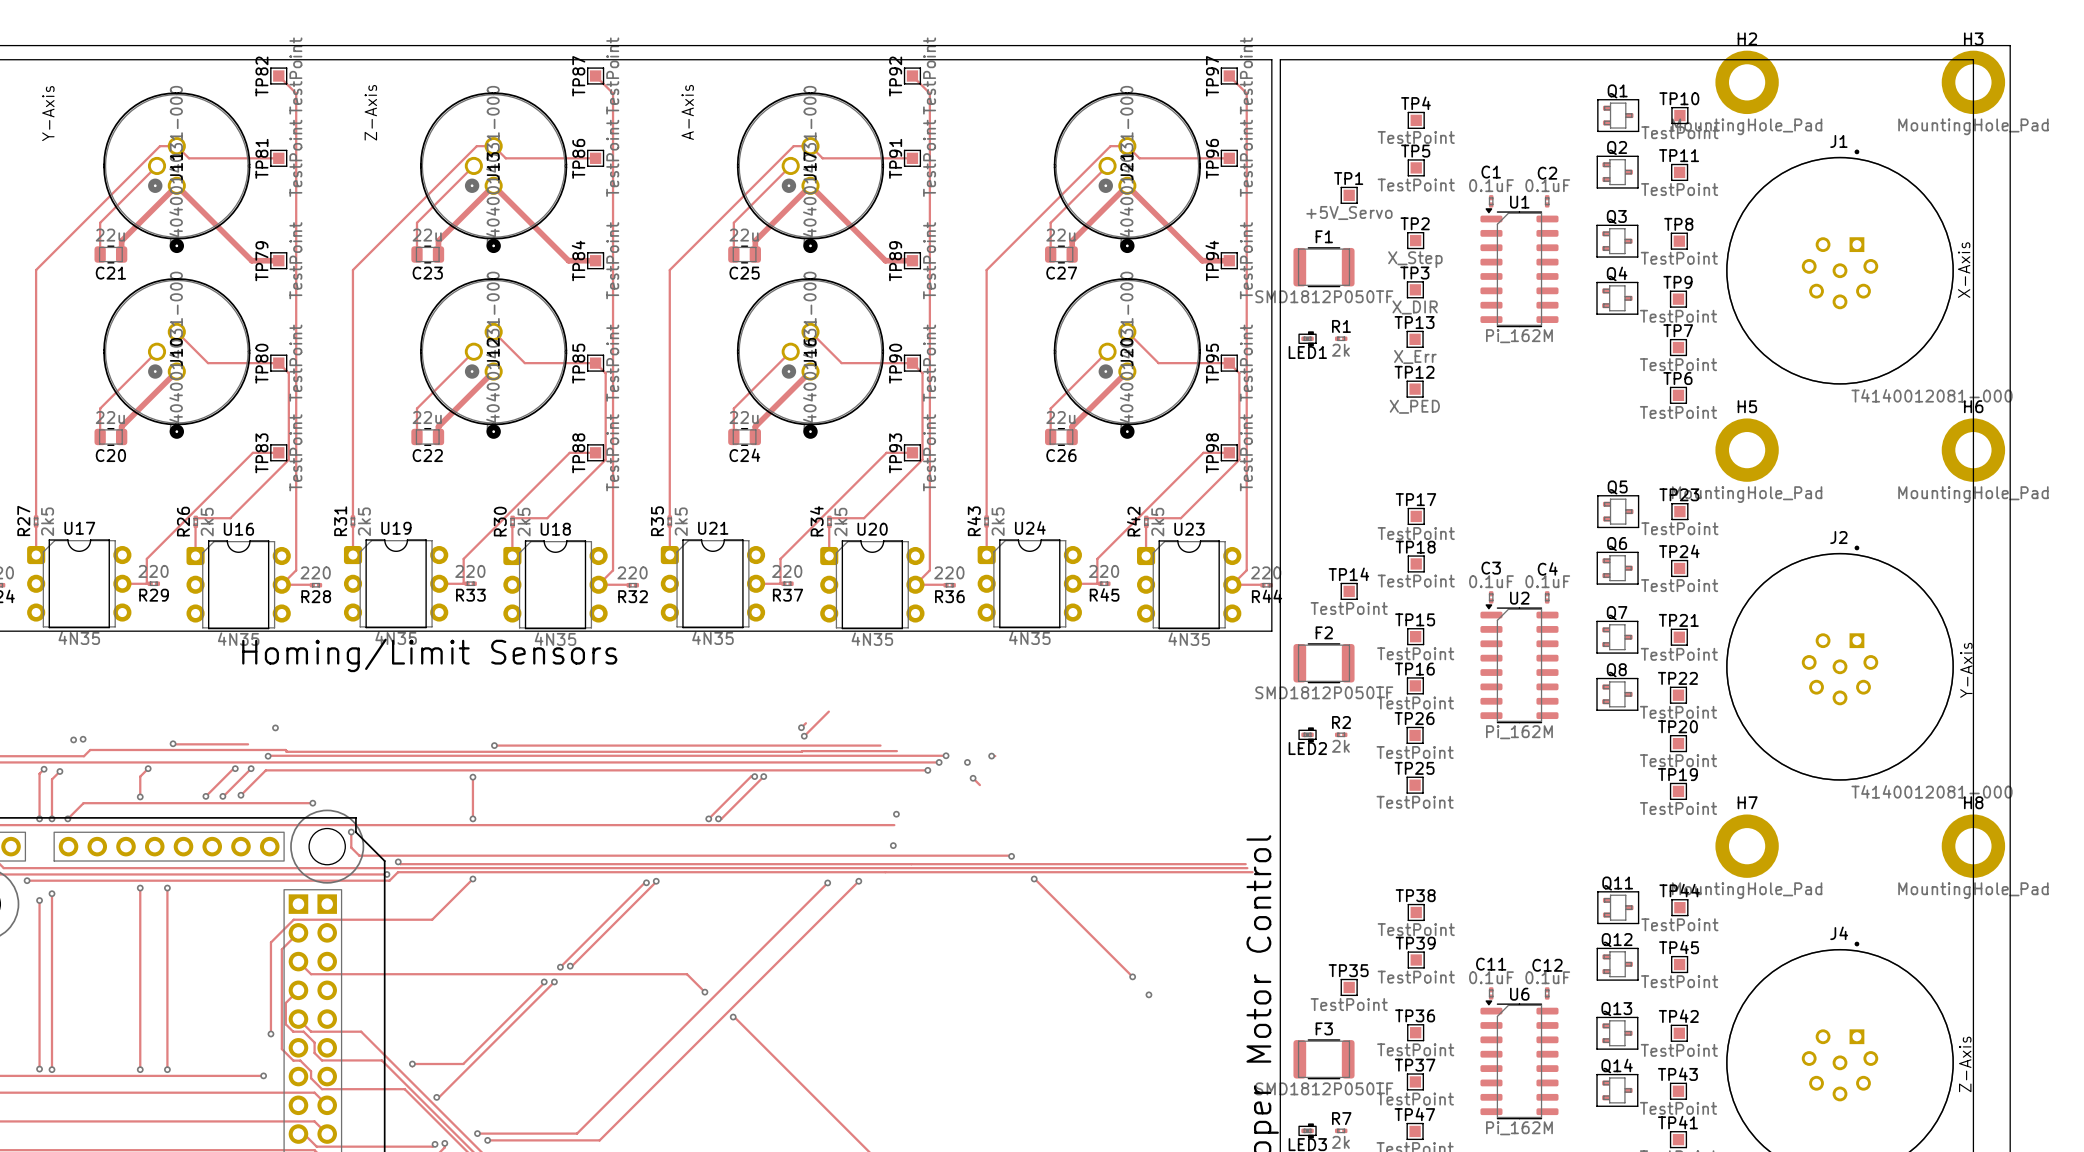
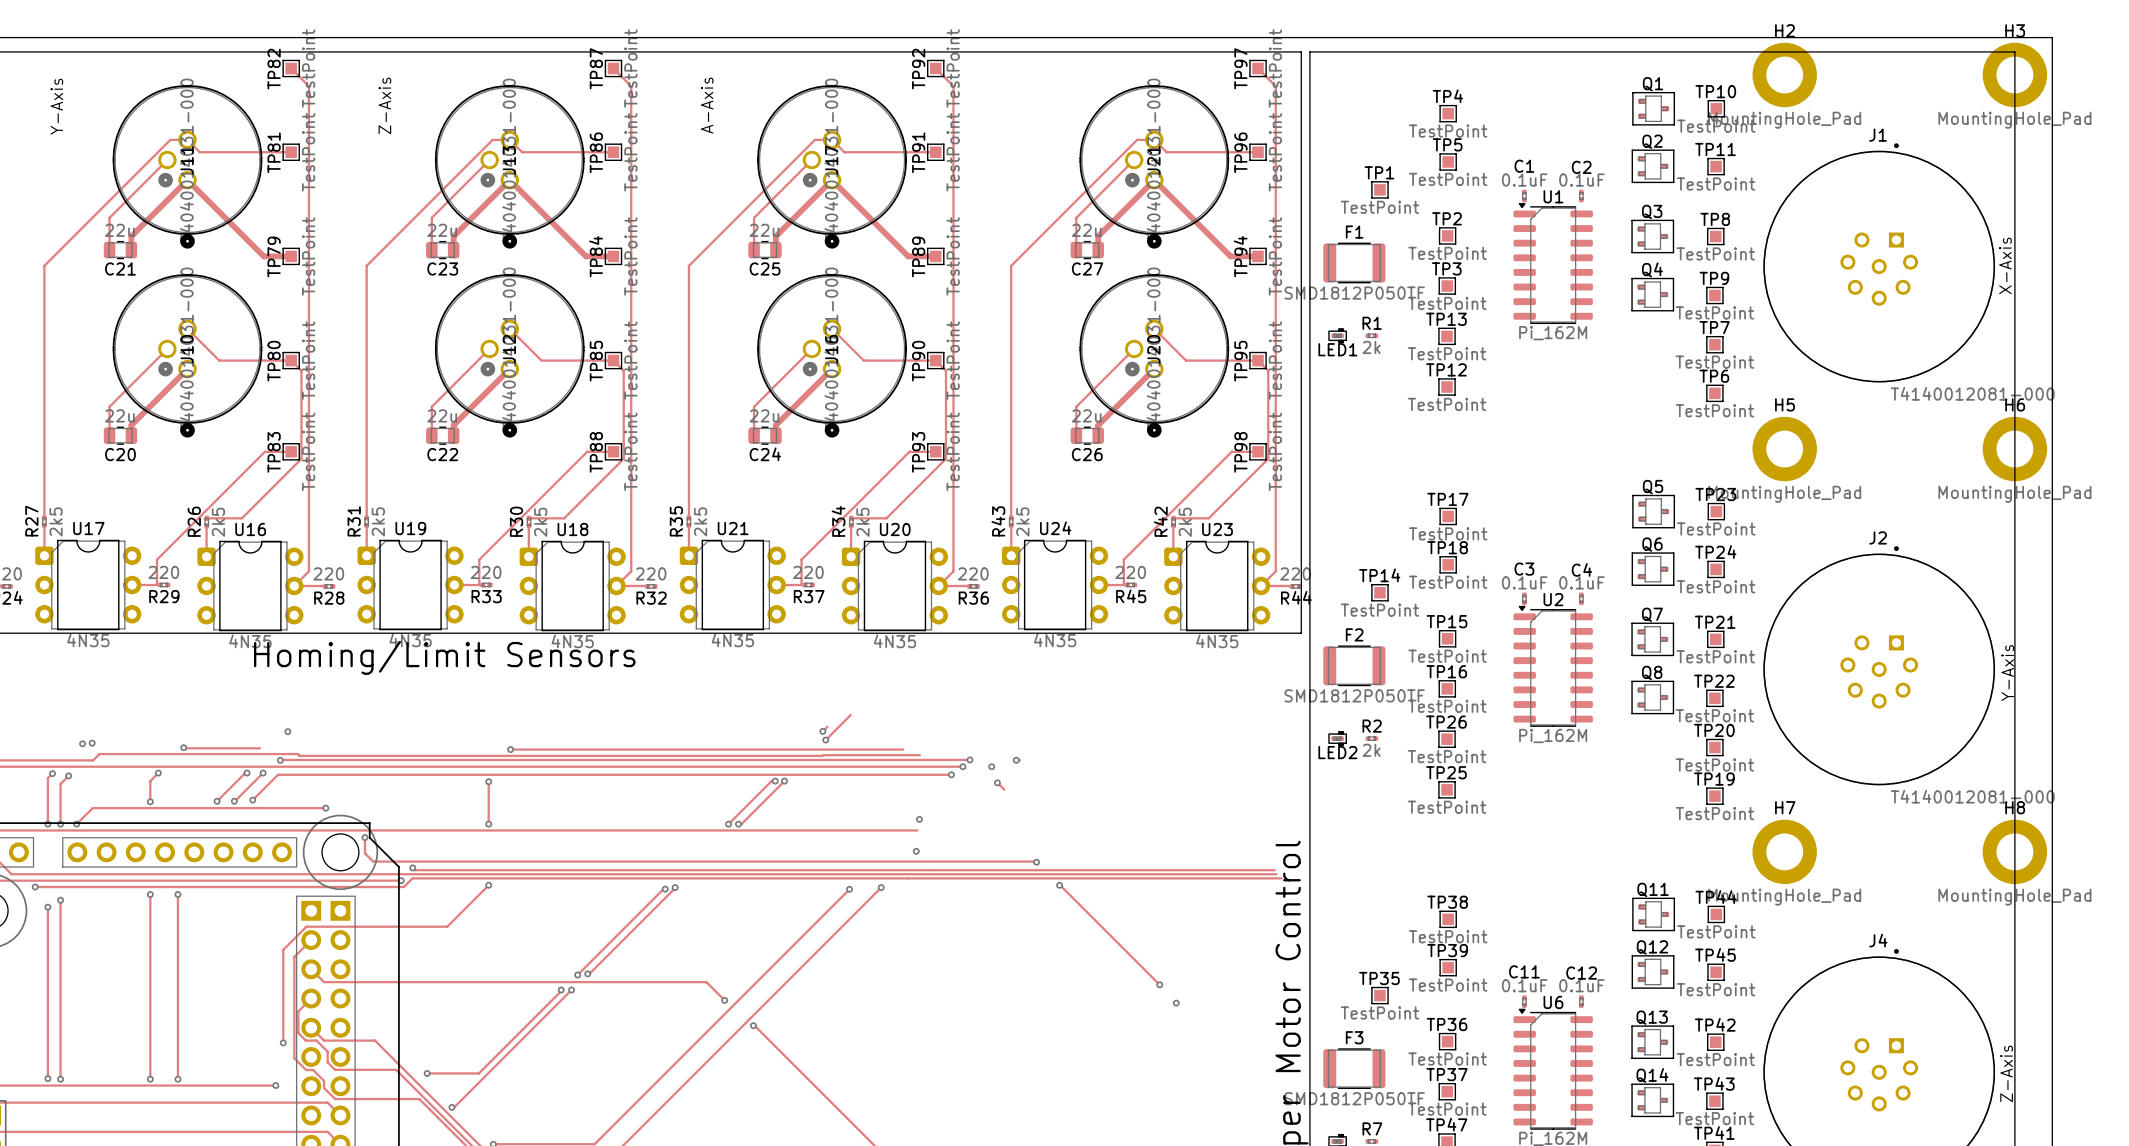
TP1 value: +5V_Servo (1349, 212) -> TestPoint (1379, 207)
TP2 value: X_Step (1415, 259) -> TestPoint (1447, 253)
TP3 value: X_DIR (1415, 307) -> TestPoint (1447, 303)
TP13 value: X_Err (1415, 356) -> TestPoint (1447, 353)
TP12 value: X_PED (1414, 406) -> TestPoint (1447, 404)

